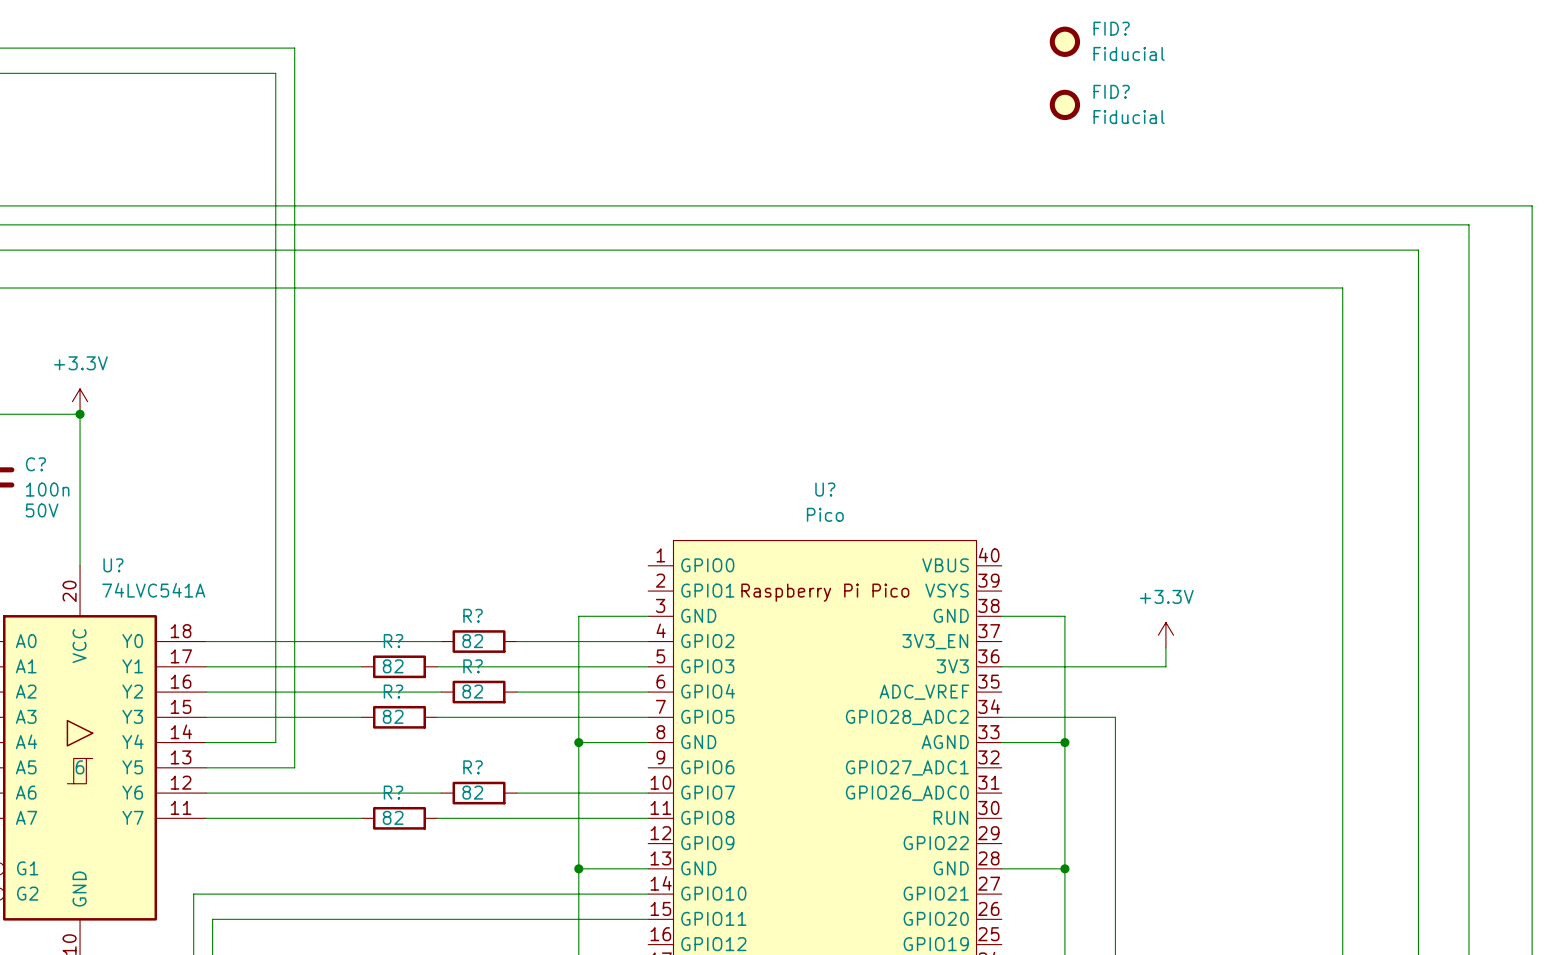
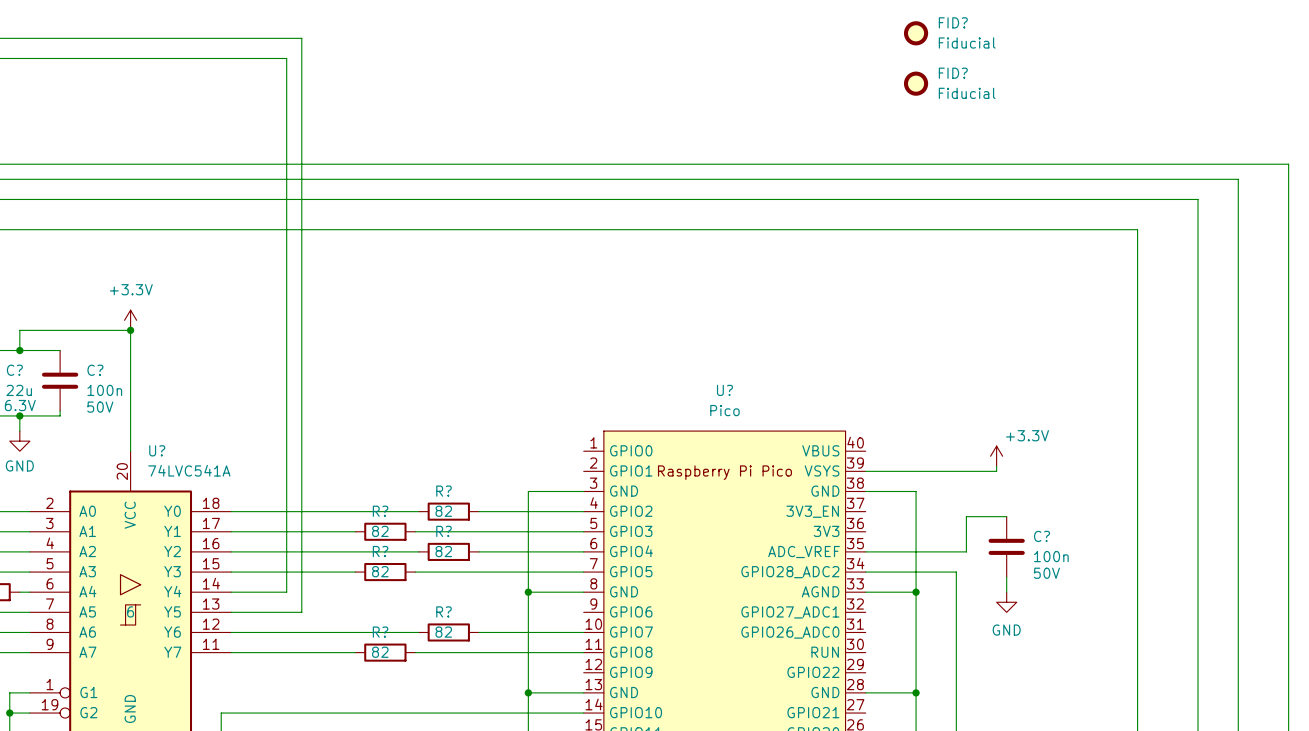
wire: none -> (996, 466) (996, 471) (865, 471)
power symbol text position: +3.3V (1166, 596) -> +3.3V (1027, 435)
power symbol position: +3.3V (1165, 635) -> +3.3V (996, 456)
wire: (1165, 647) (1165, 666) (1001, 666) -> none
wire: none -> (1006, 516) (966, 516) (966, 551) (865, 551)
C?: none -> 100n (1006, 546)
wire: none -> (1006, 577) (1006, 592)
power symbol: none -> GND (1006, 602)

